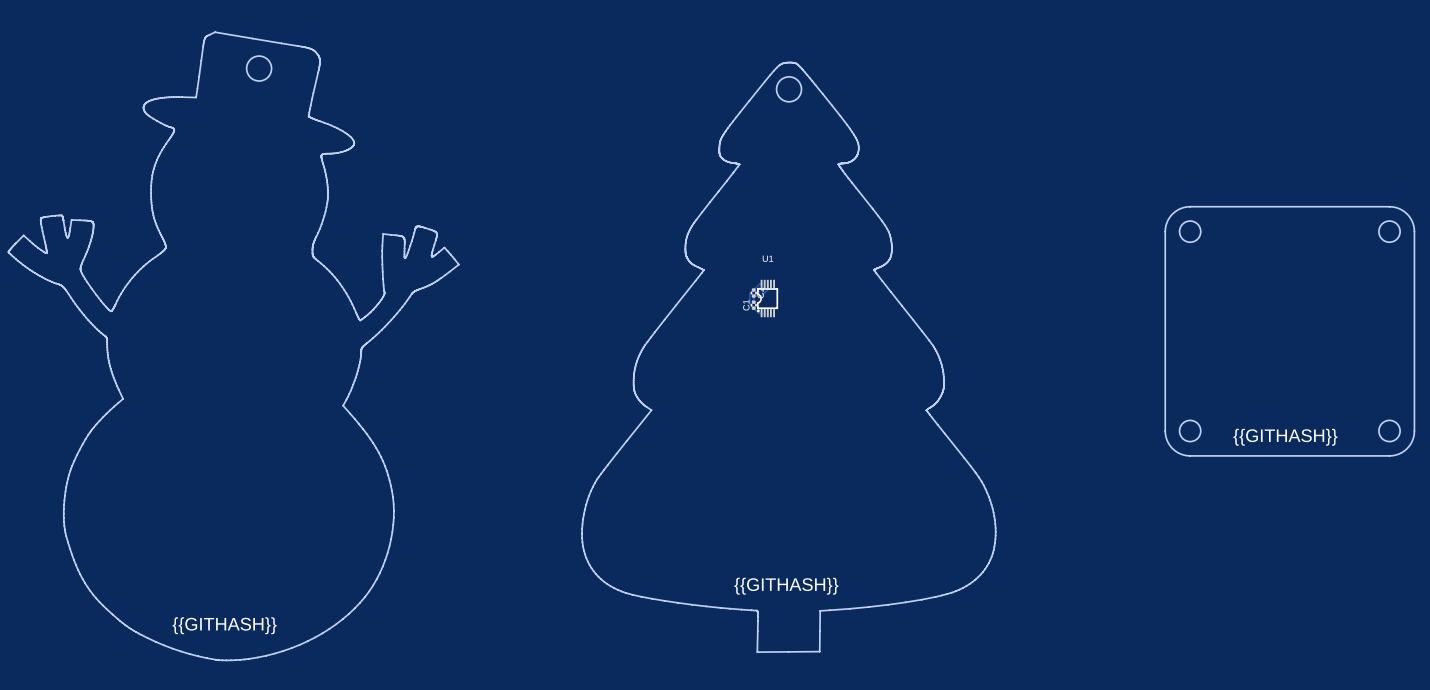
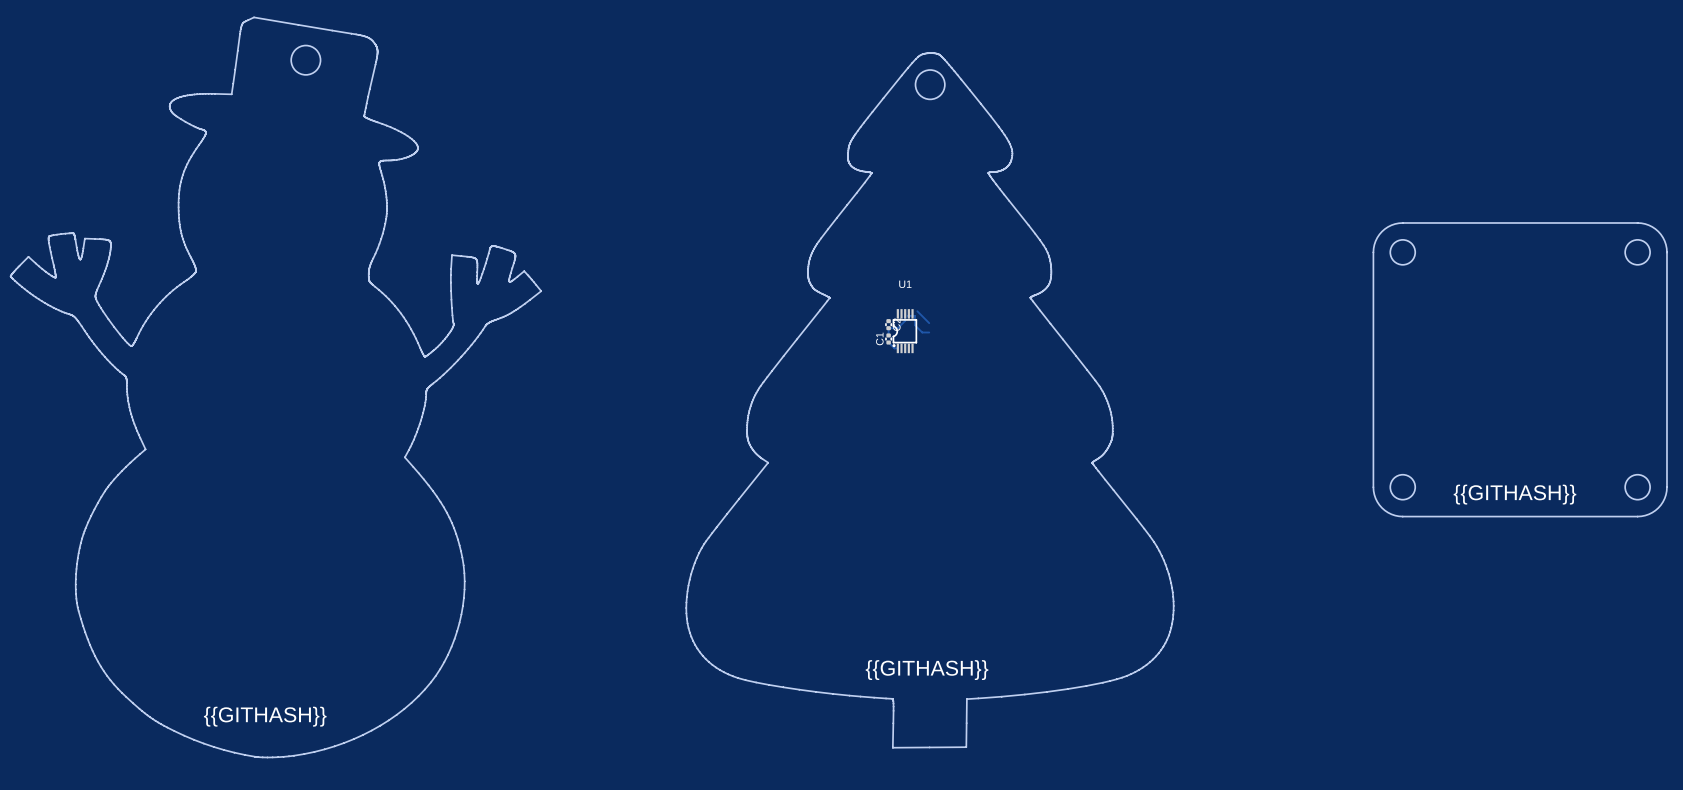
track: none -> (917, 311) (929, 323)
track: (761, 283) (749, 293) (749, 304) (753, 308) -> none
track: none -> (907, 315) (914, 315) (914, 325) (922, 332) (929, 332)

